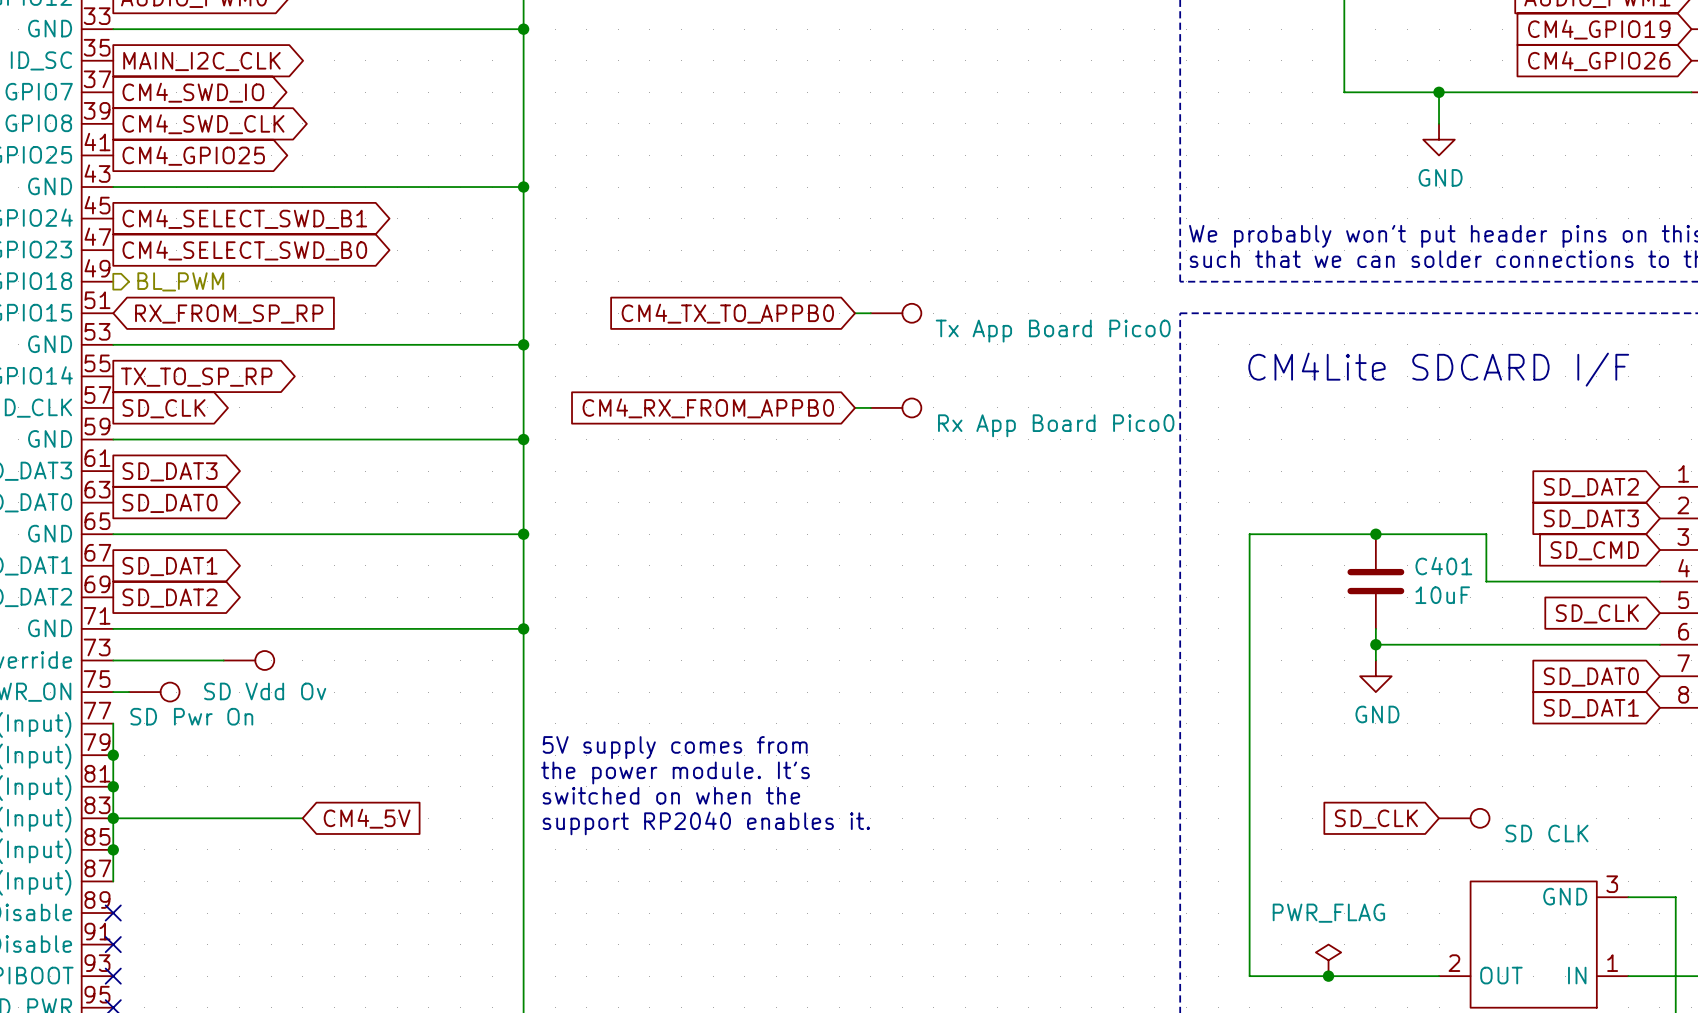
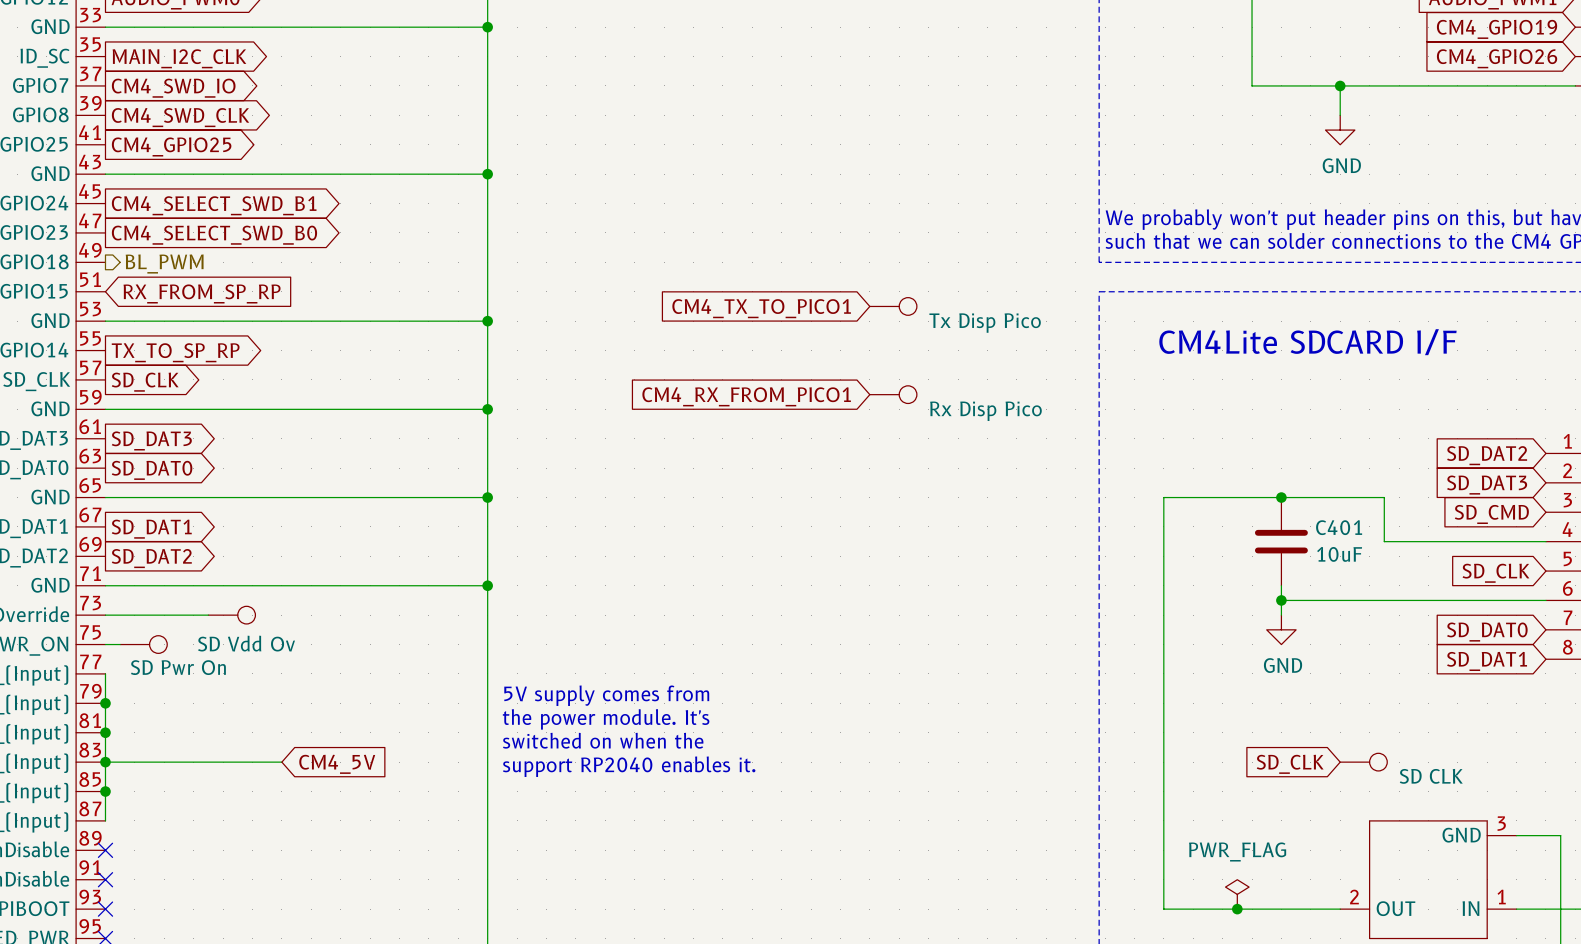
global label: CM4_TX_TO_APPB0 (727, 313) -> CM4_TX_TO_PICO1 (761, 308)
part: Tx App Board Pico0 (896, 313) -> none
part: none -> Tx Disp Pico (893, 306)
part: Rx App Board Pico0 (896, 407) -> none
global label: CM4_RX_FROM_APPB0 (708, 408) -> CM4_RX_FROM_PICO1 (746, 396)
part: none -> Rx Disp Pico (893, 394)

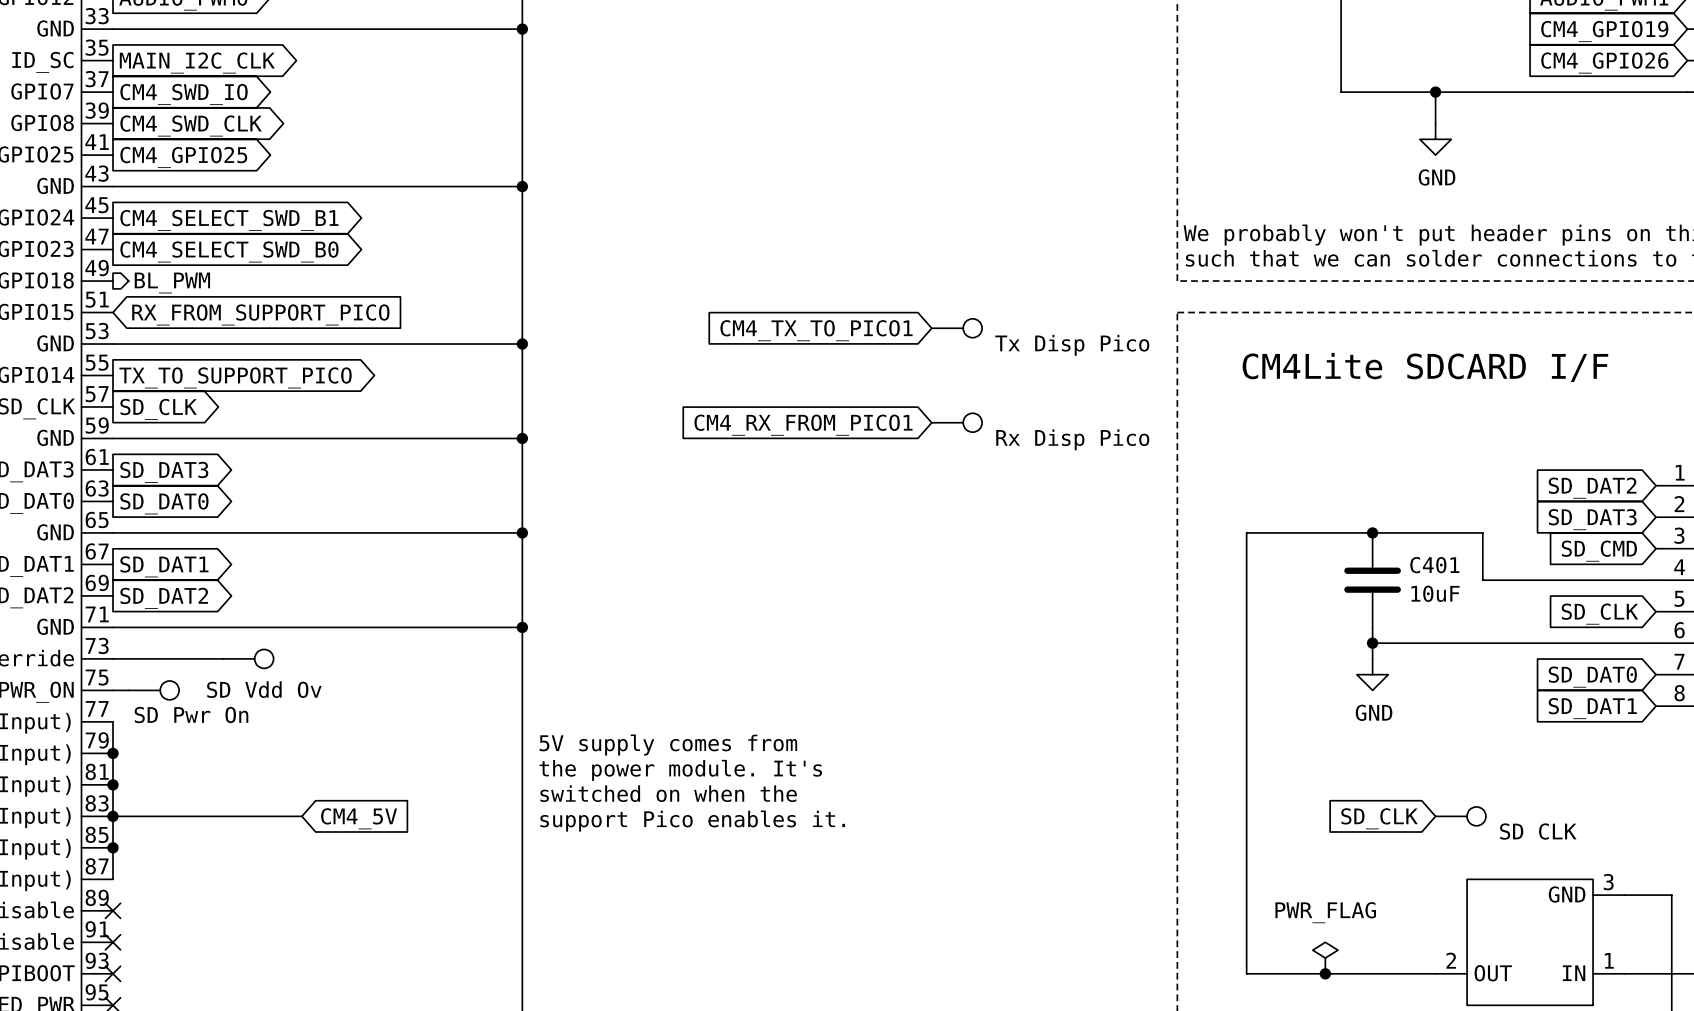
global label: RX_FROM_SP_RP (202, 293) -> RX_FROM_SUPPORT_PICO (260, 314)
global label: TX_TO_SP_RP (175, 352) -> TX_TO_SUPPORT_PICO (235, 377)
text: support RP2040 enables it. (629, 766) -> support Pico enables it. (692, 821)

